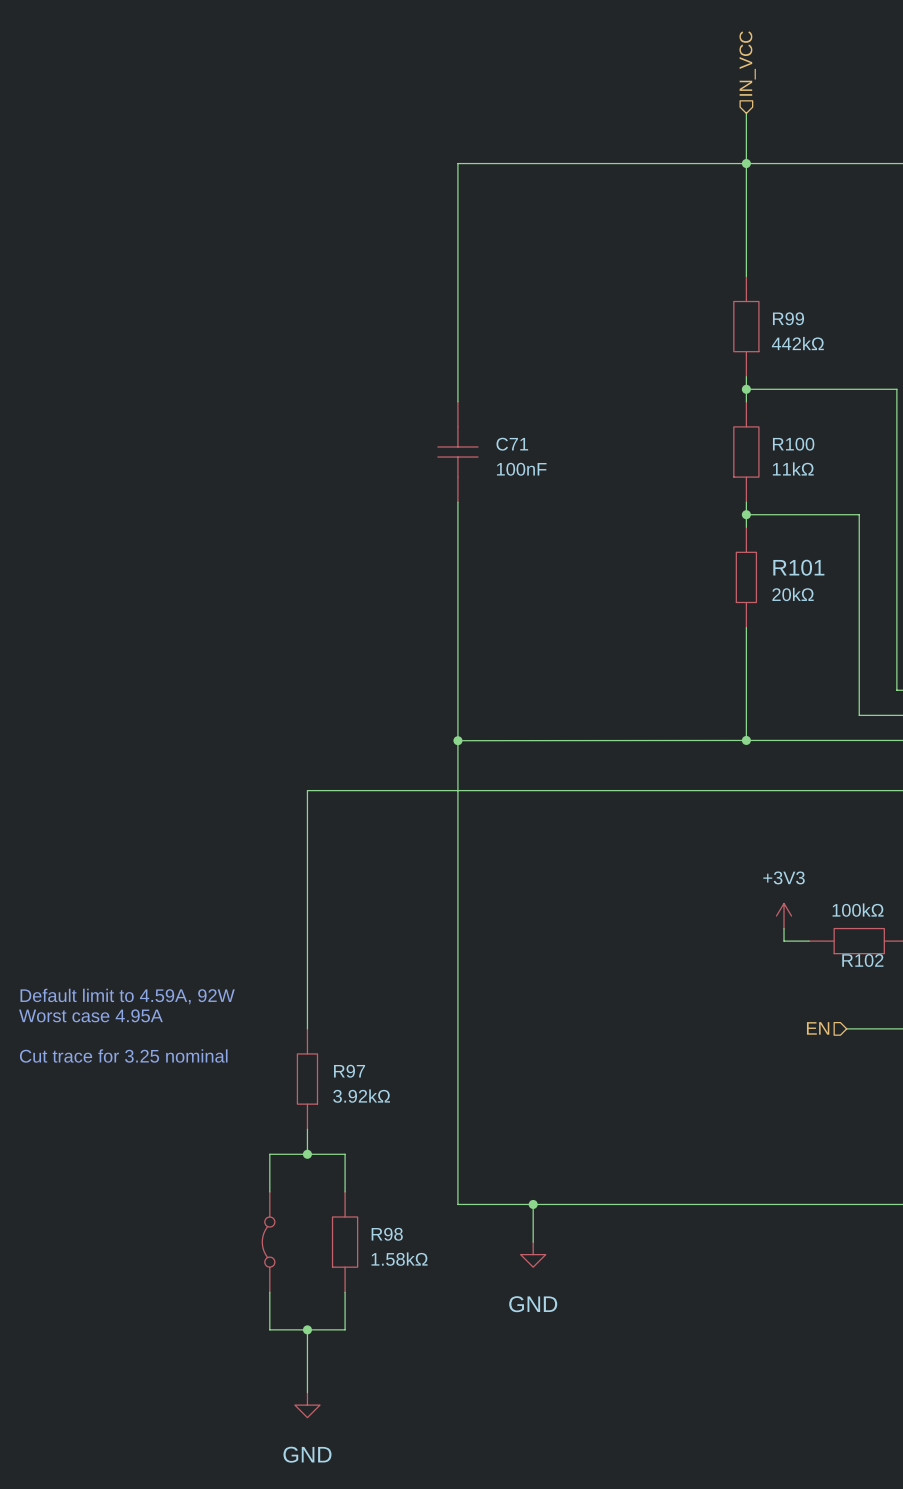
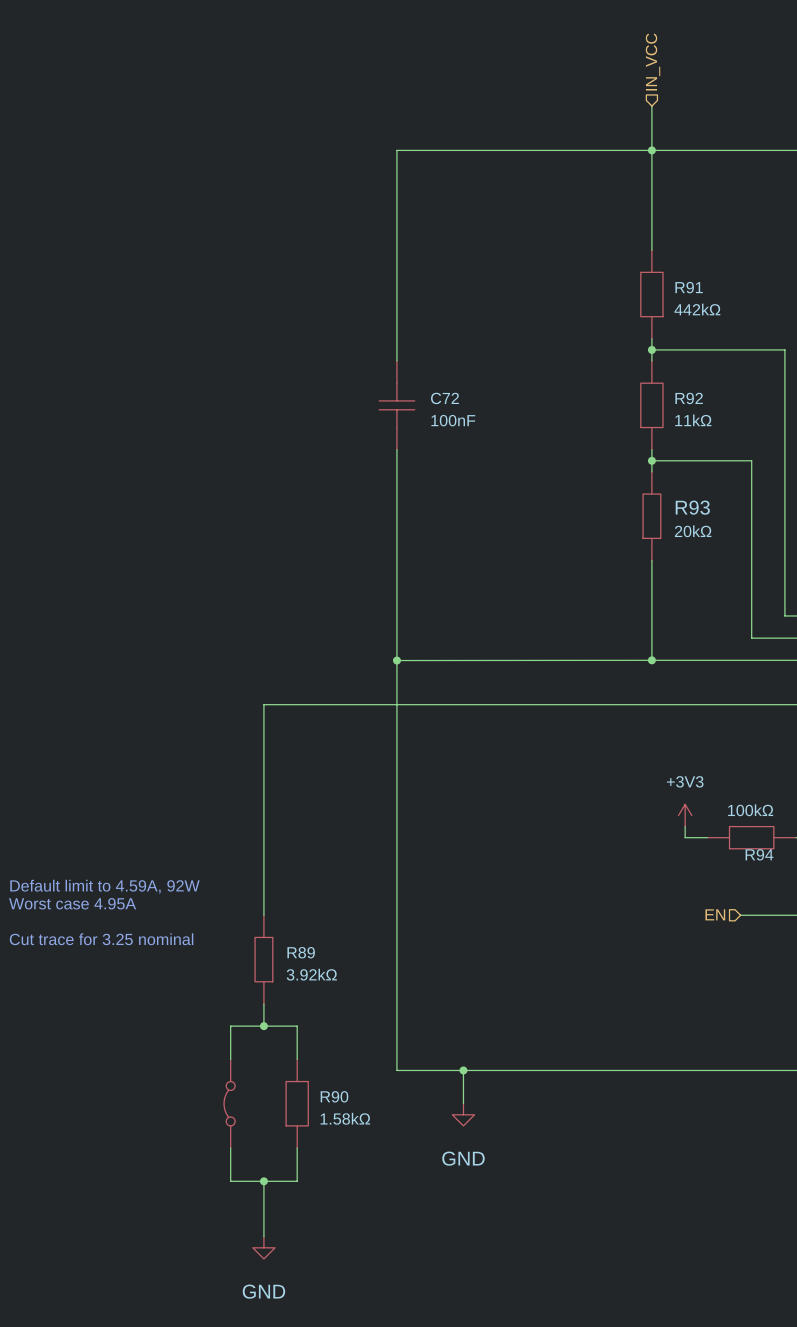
R99 name: R99 (788, 318) -> R91 (689, 287)
C71 name: C71 (512, 444) -> C72 (444, 398)
R100 name: R100 (793, 444) -> R92 (689, 398)
R101 name: R101 (798, 567) -> R93 (692, 507)
R102 name: R102 (862, 960) -> R94 (759, 854)
R97 name: R97 (349, 1071) -> R89 (301, 952)
R98 name: R98 (387, 1234) -> R90 (334, 1096)

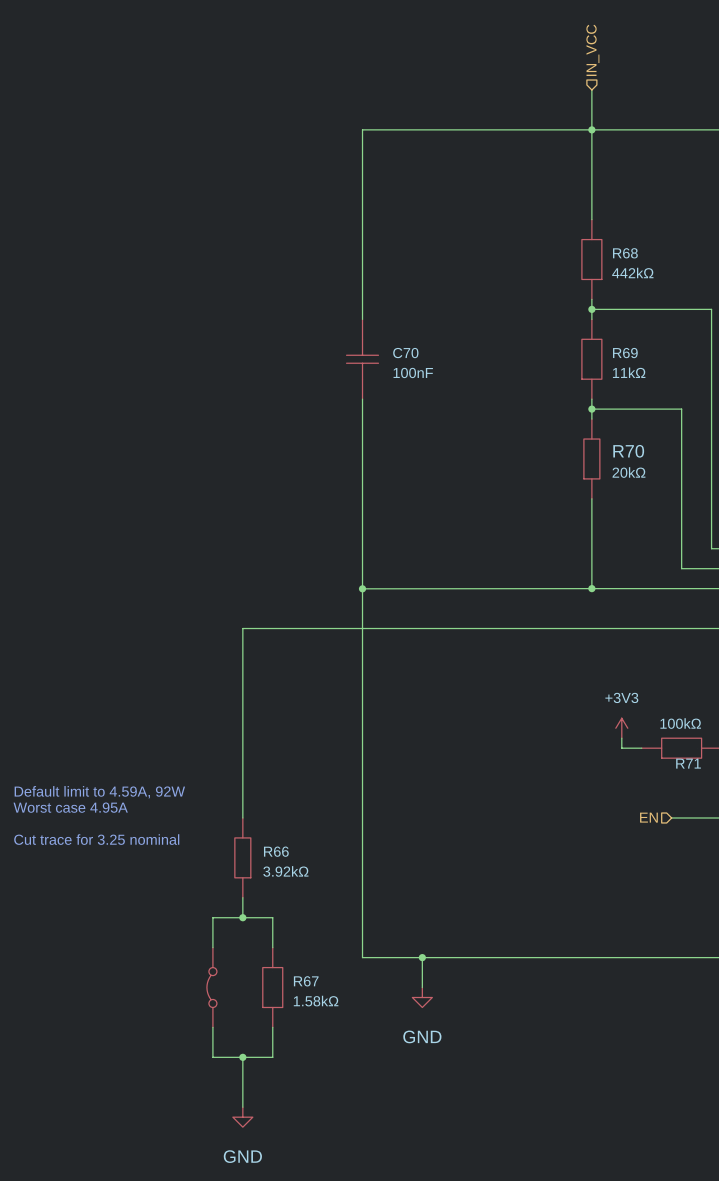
R91 name: R91 (689, 287) -> R68 (625, 253)
C72 name: C72 (444, 398) -> C70 (405, 353)
R92 name: R92 (689, 398) -> R69 (625, 353)
R93 name: R93 (692, 507) -> R70 (628, 451)
R94 name: R94 (759, 854) -> R71 (688, 763)
R89 name: R89 (301, 952) -> R66 (276, 851)
R90 name: R90 (334, 1096) -> R67 (306, 981)

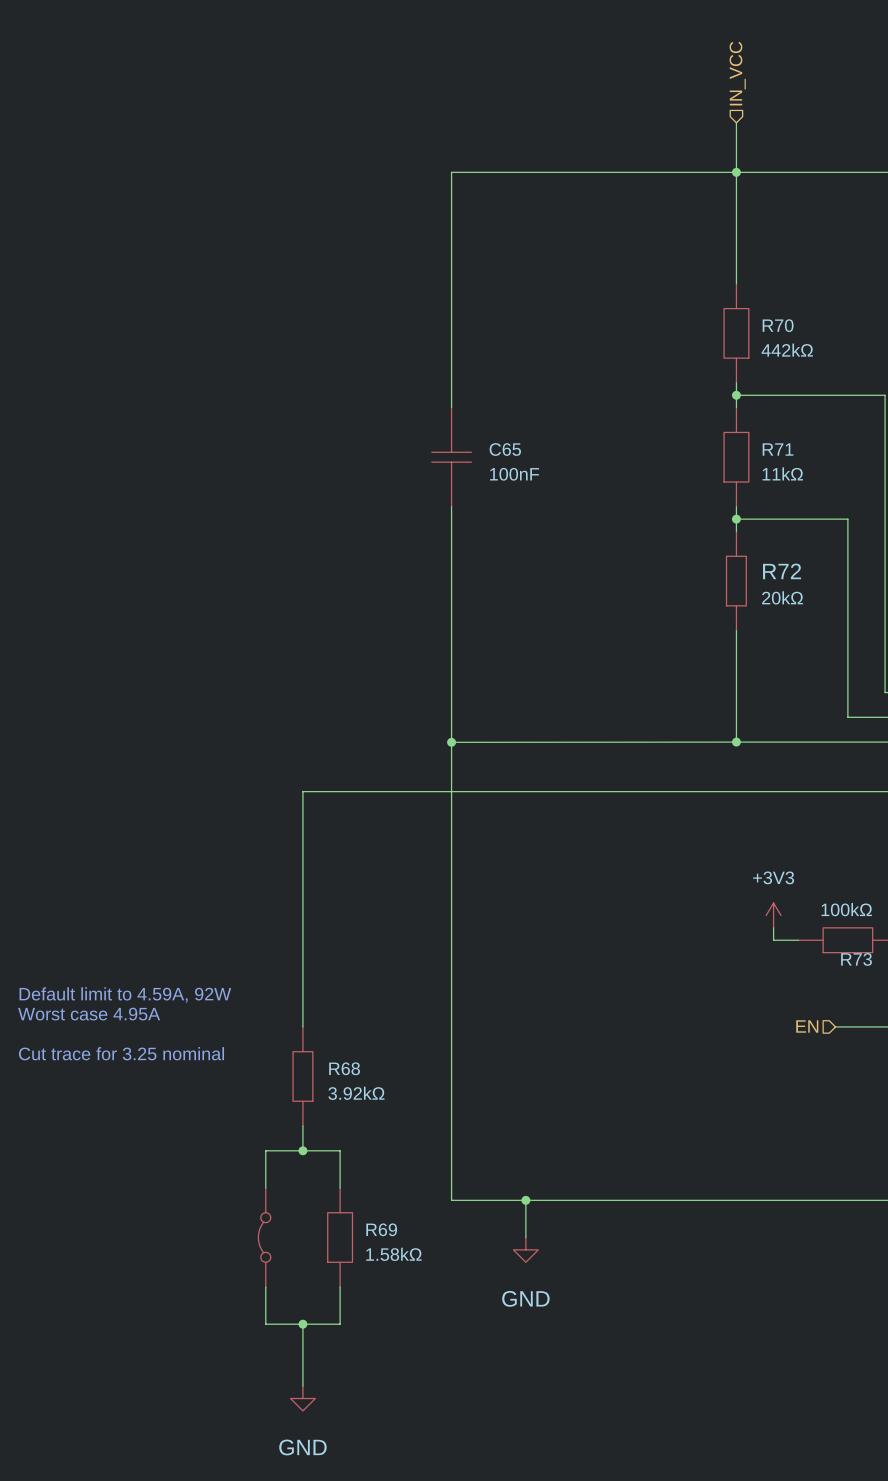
R68 name: R68 (625, 253) -> R70 (778, 325)
C70 name: C70 (405, 353) -> C65 (505, 449)
R69 name: R69 (625, 353) -> R71 (778, 449)
R70 name: R70 (628, 451) -> R72 (782, 571)
R71 name: R71 (688, 763) -> R73 (856, 959)
R66 name: R66 (276, 851) -> R68 (344, 1068)
R67 name: R67 (306, 981) -> R69 (381, 1229)

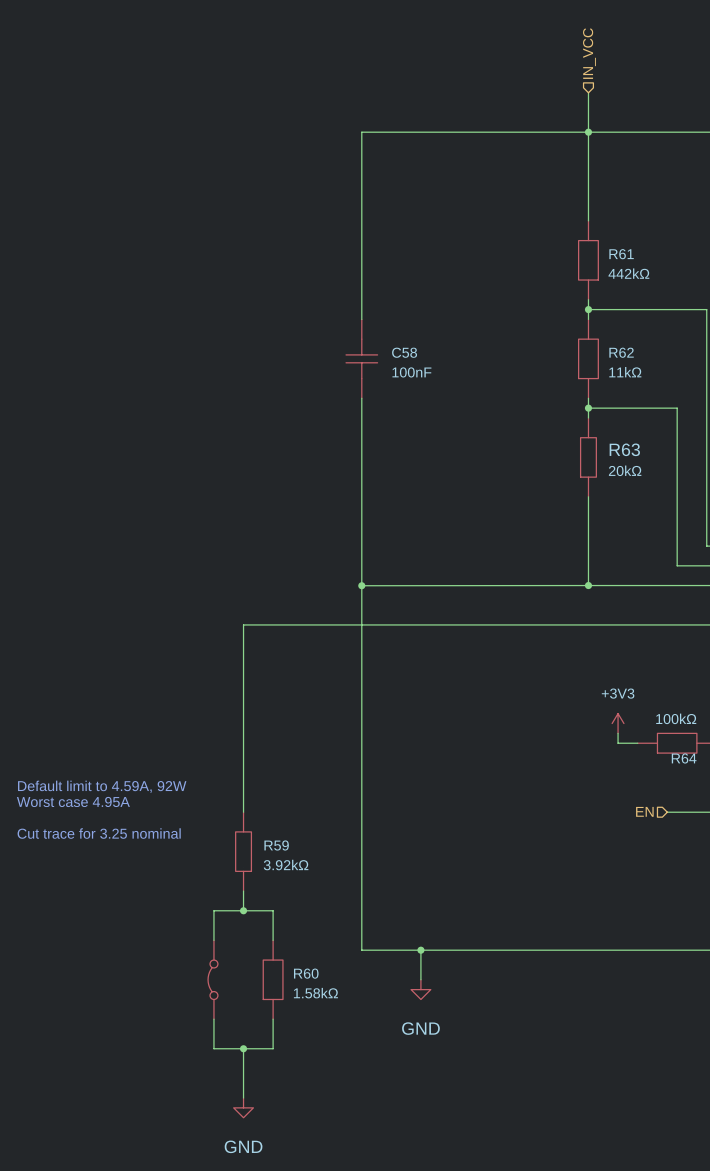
R70 name: R70 (778, 325) -> R61 (621, 254)
C65 name: C65 (505, 449) -> C58 (404, 352)
R71 name: R71 (778, 449) -> R62 (621, 352)
R72 name: R72 (782, 571) -> R63 (624, 449)
R73 name: R73 (856, 959) -> R64 (684, 758)
R68 name: R68 (344, 1068) -> R59 (276, 845)
R69 name: R69 (381, 1229) -> R60 (306, 973)

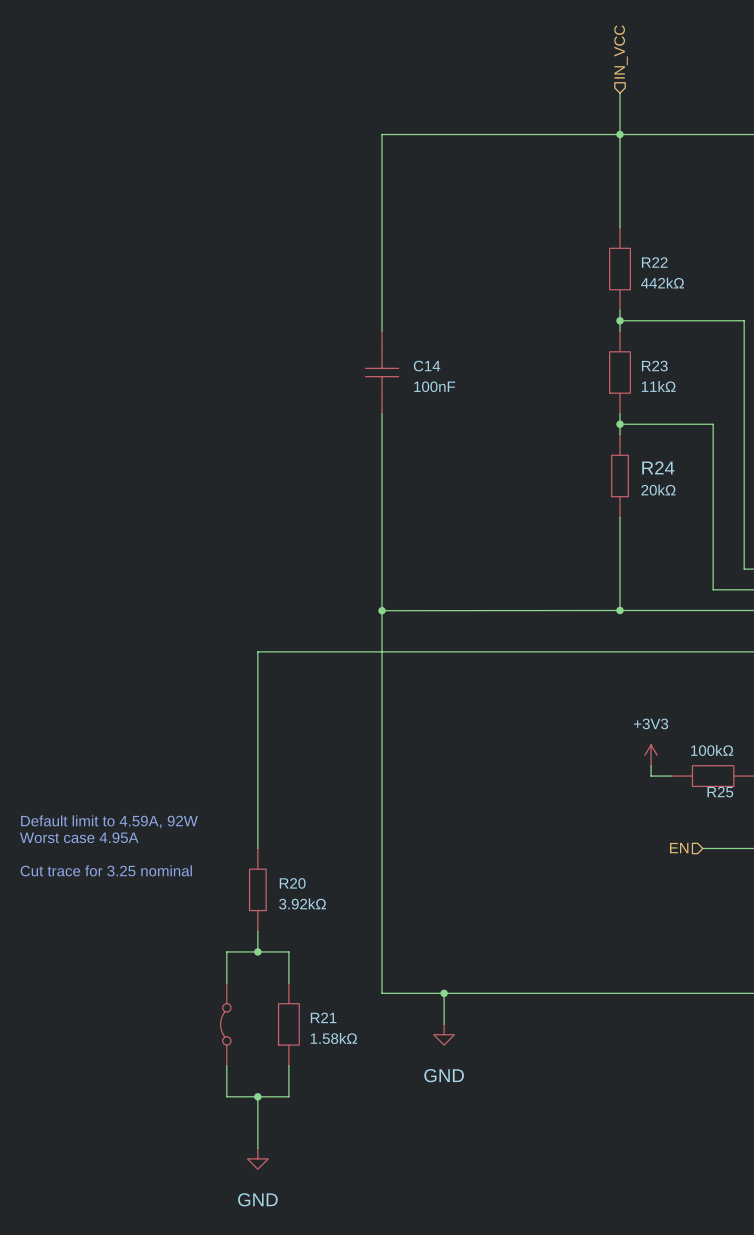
R61 name: R61 (621, 254) -> R22 (654, 262)
C58 name: C58 (404, 352) -> C14 (427, 366)
R62 name: R62 (621, 352) -> R23 (654, 366)
R63 name: R63 (624, 449) -> R24 (658, 467)
R64 name: R64 (684, 758) -> R25 (720, 792)
R59 name: R59 (276, 845) -> R20 (292, 883)
R60 name: R60 (306, 973) -> R21 (323, 1017)

